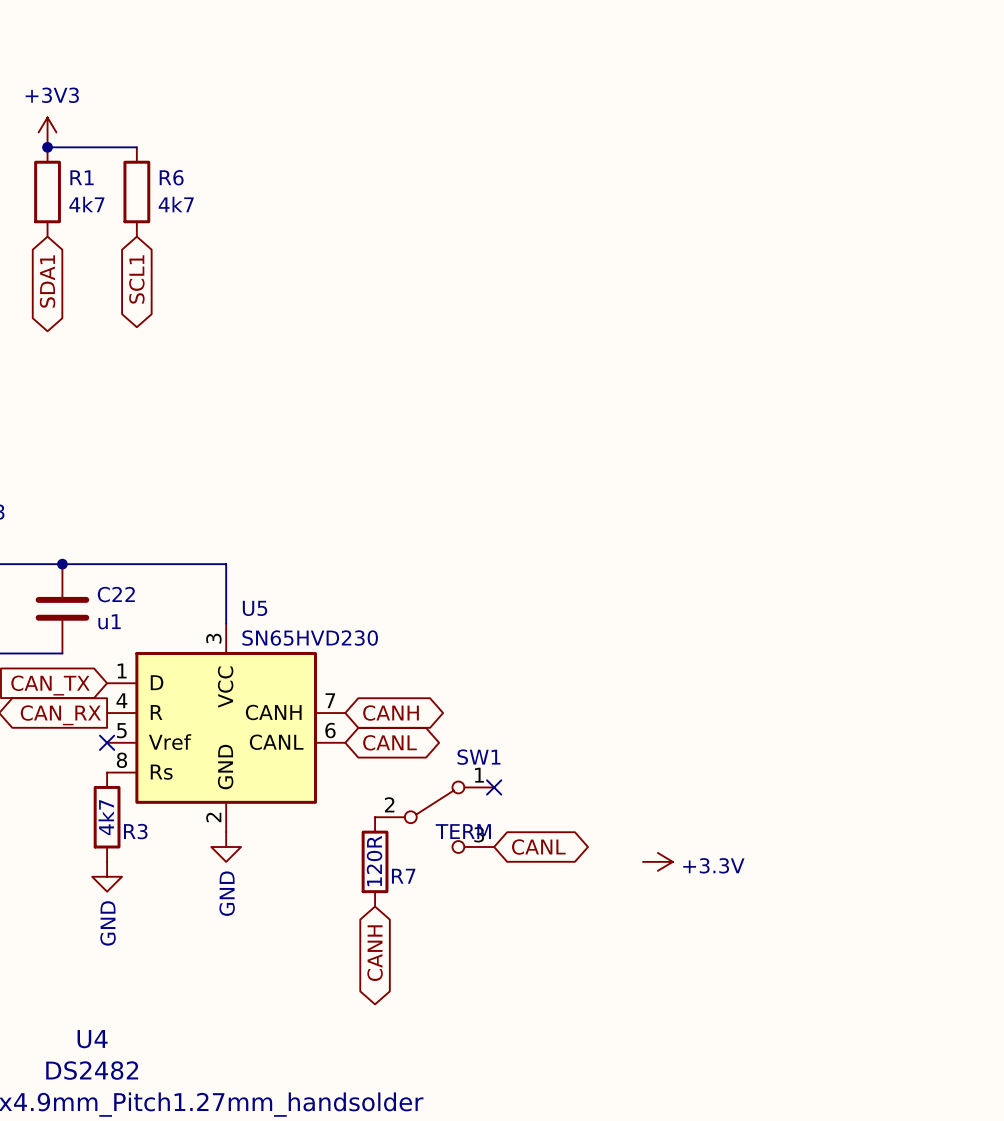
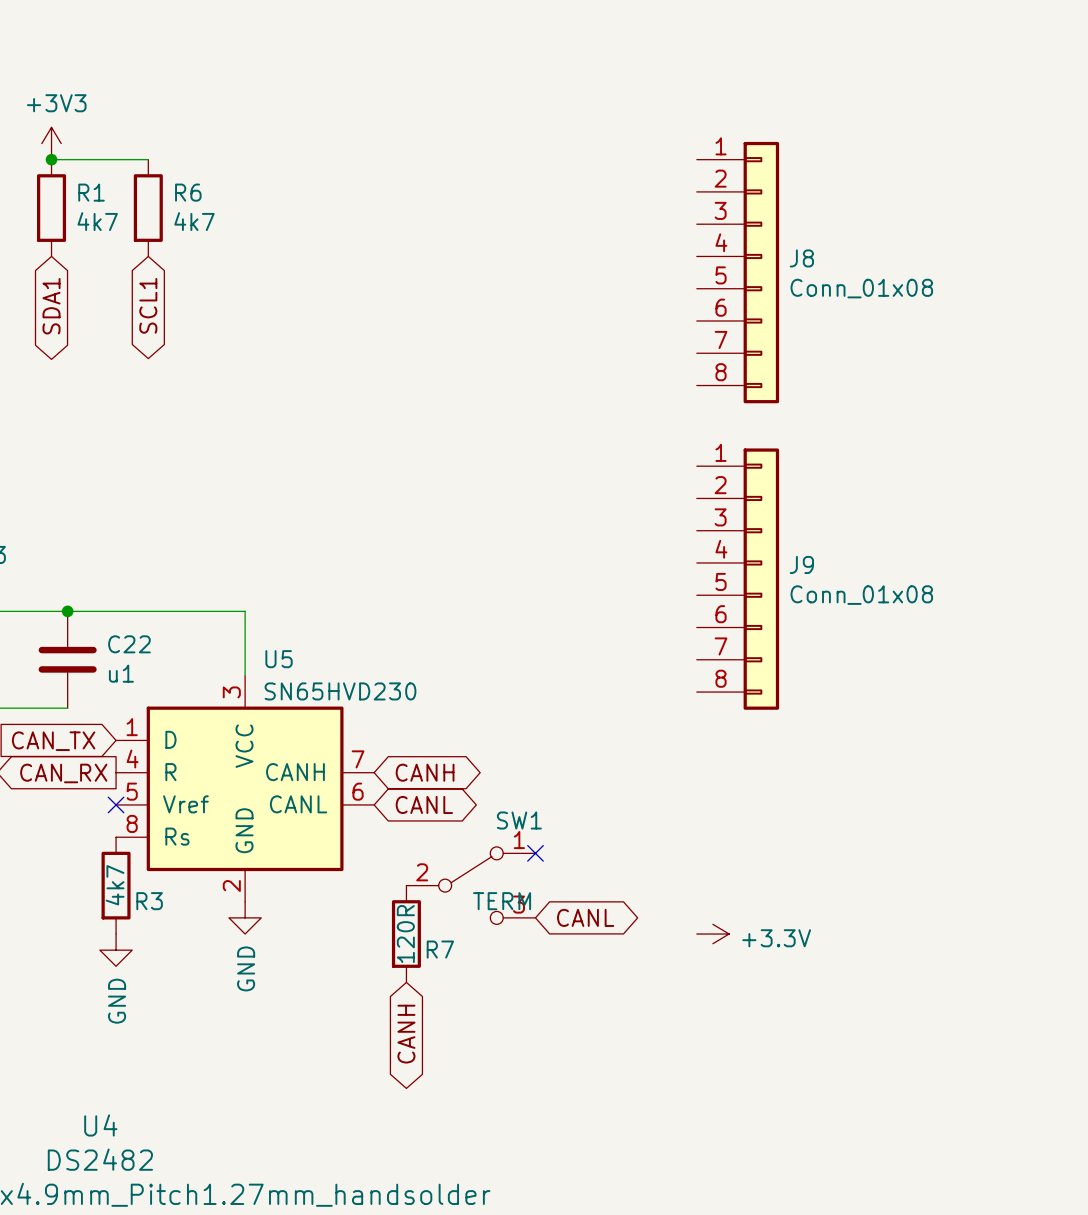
J8: none -> Conn_01x08 (737, 272)
J9: none -> Conn_01x08 (737, 579)

